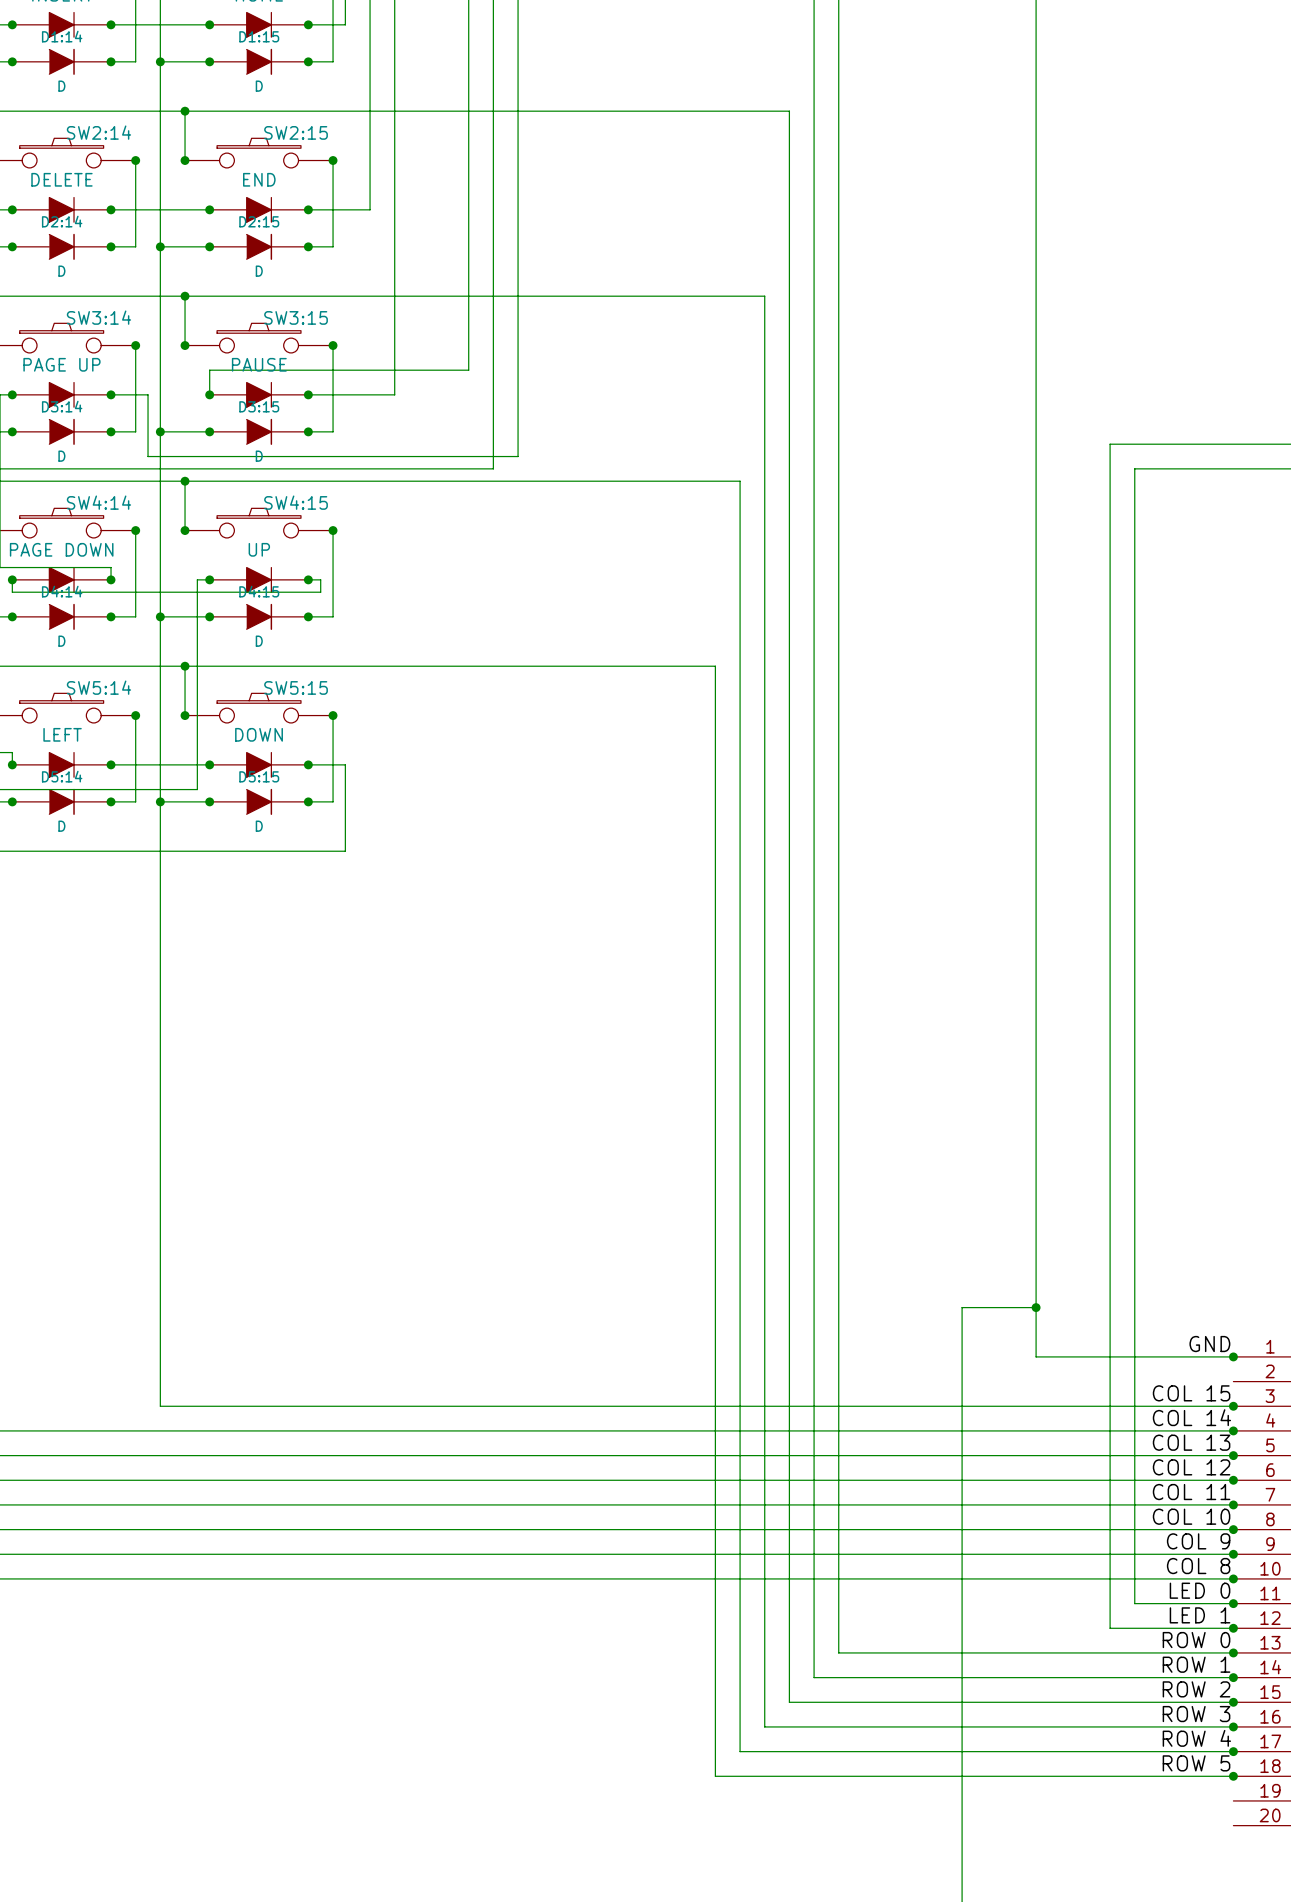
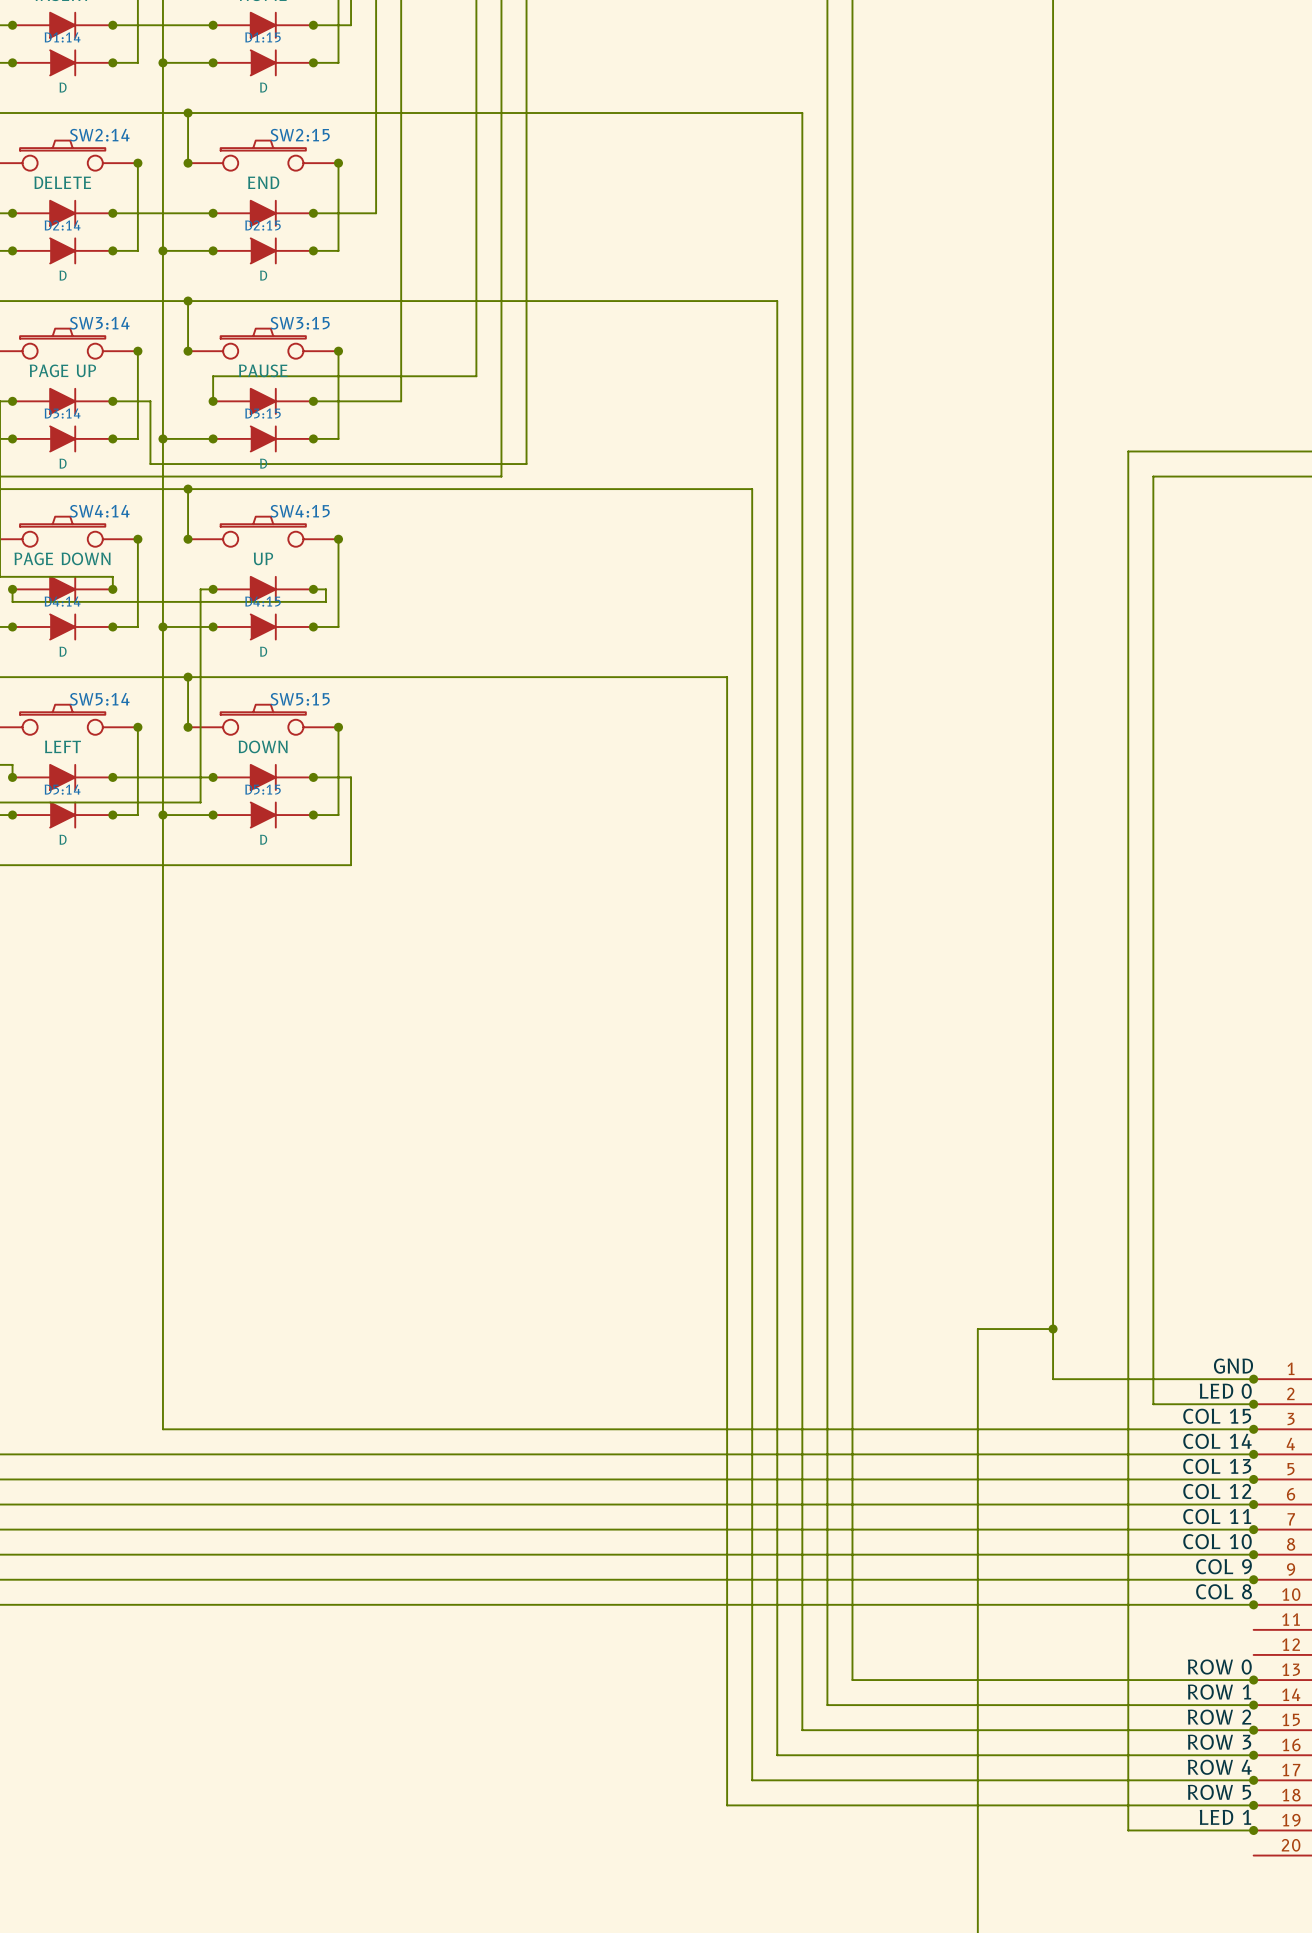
wire: (1134, 1381) (1134, 1603) (1233, 1603) -> (1153, 1404) (1253, 1404)
junction: none -> (1253, 1404)
label position: LED 0 (1200, 1590) -> LED 0 (1225, 1391)
junction: (1233, 1603) -> none
label position: LED 1 (1200, 1615) -> LED 1 (1225, 1817)
wire: (1110, 1628) (1233, 1628) -> (1128, 1654) (1128, 1830) (1253, 1830)
junction: (1233, 1628) -> none
junction: none -> (1253, 1830)

